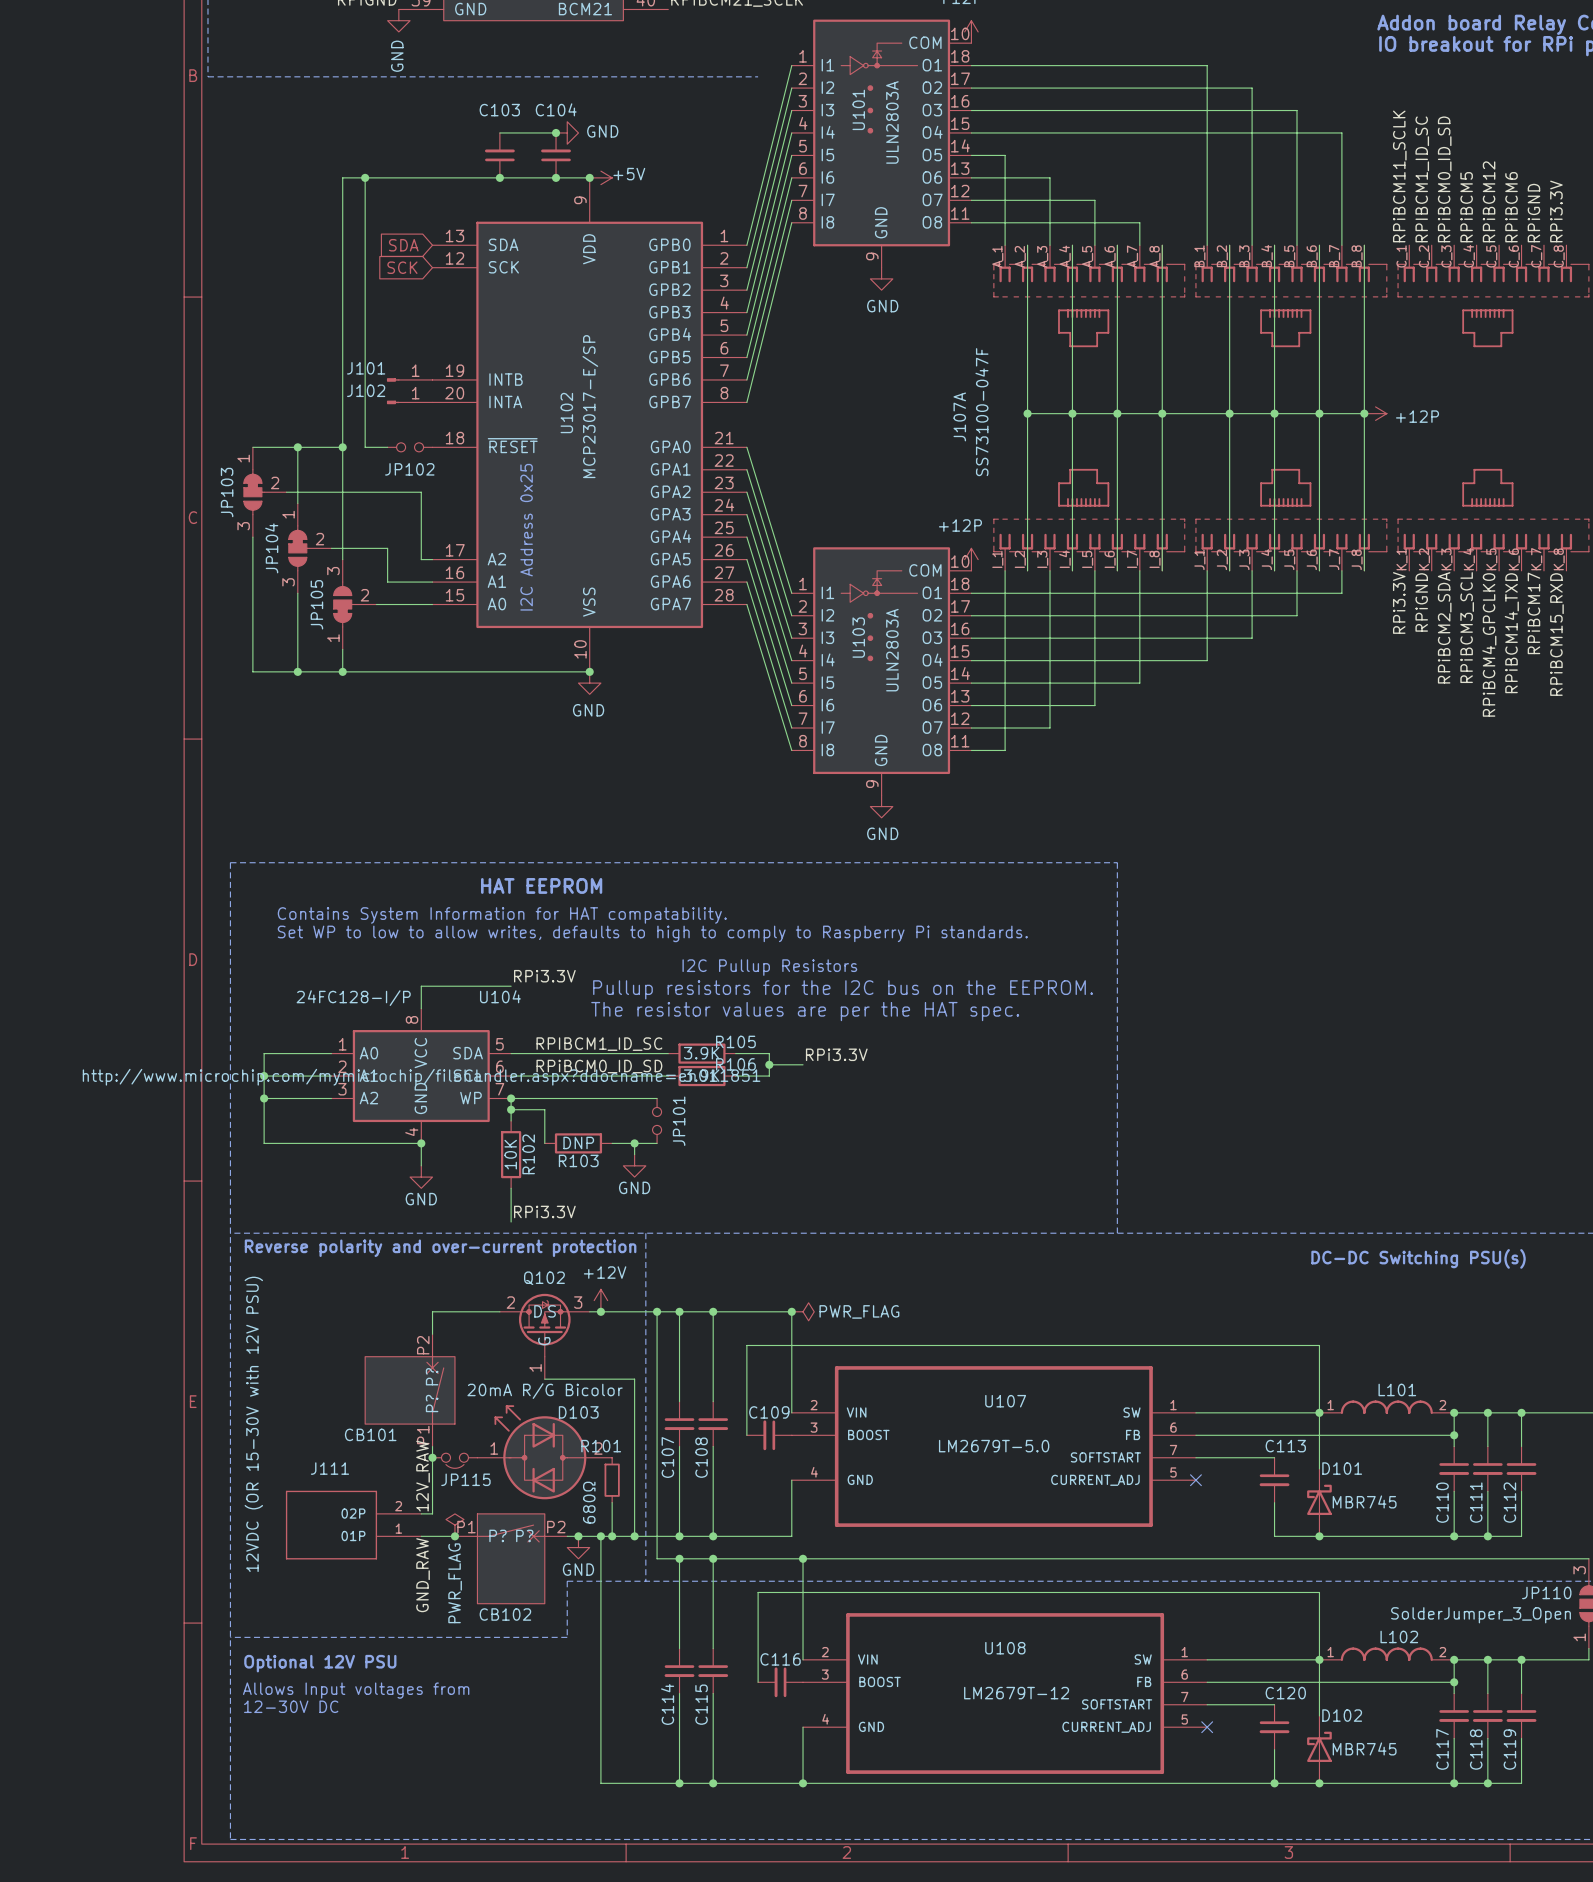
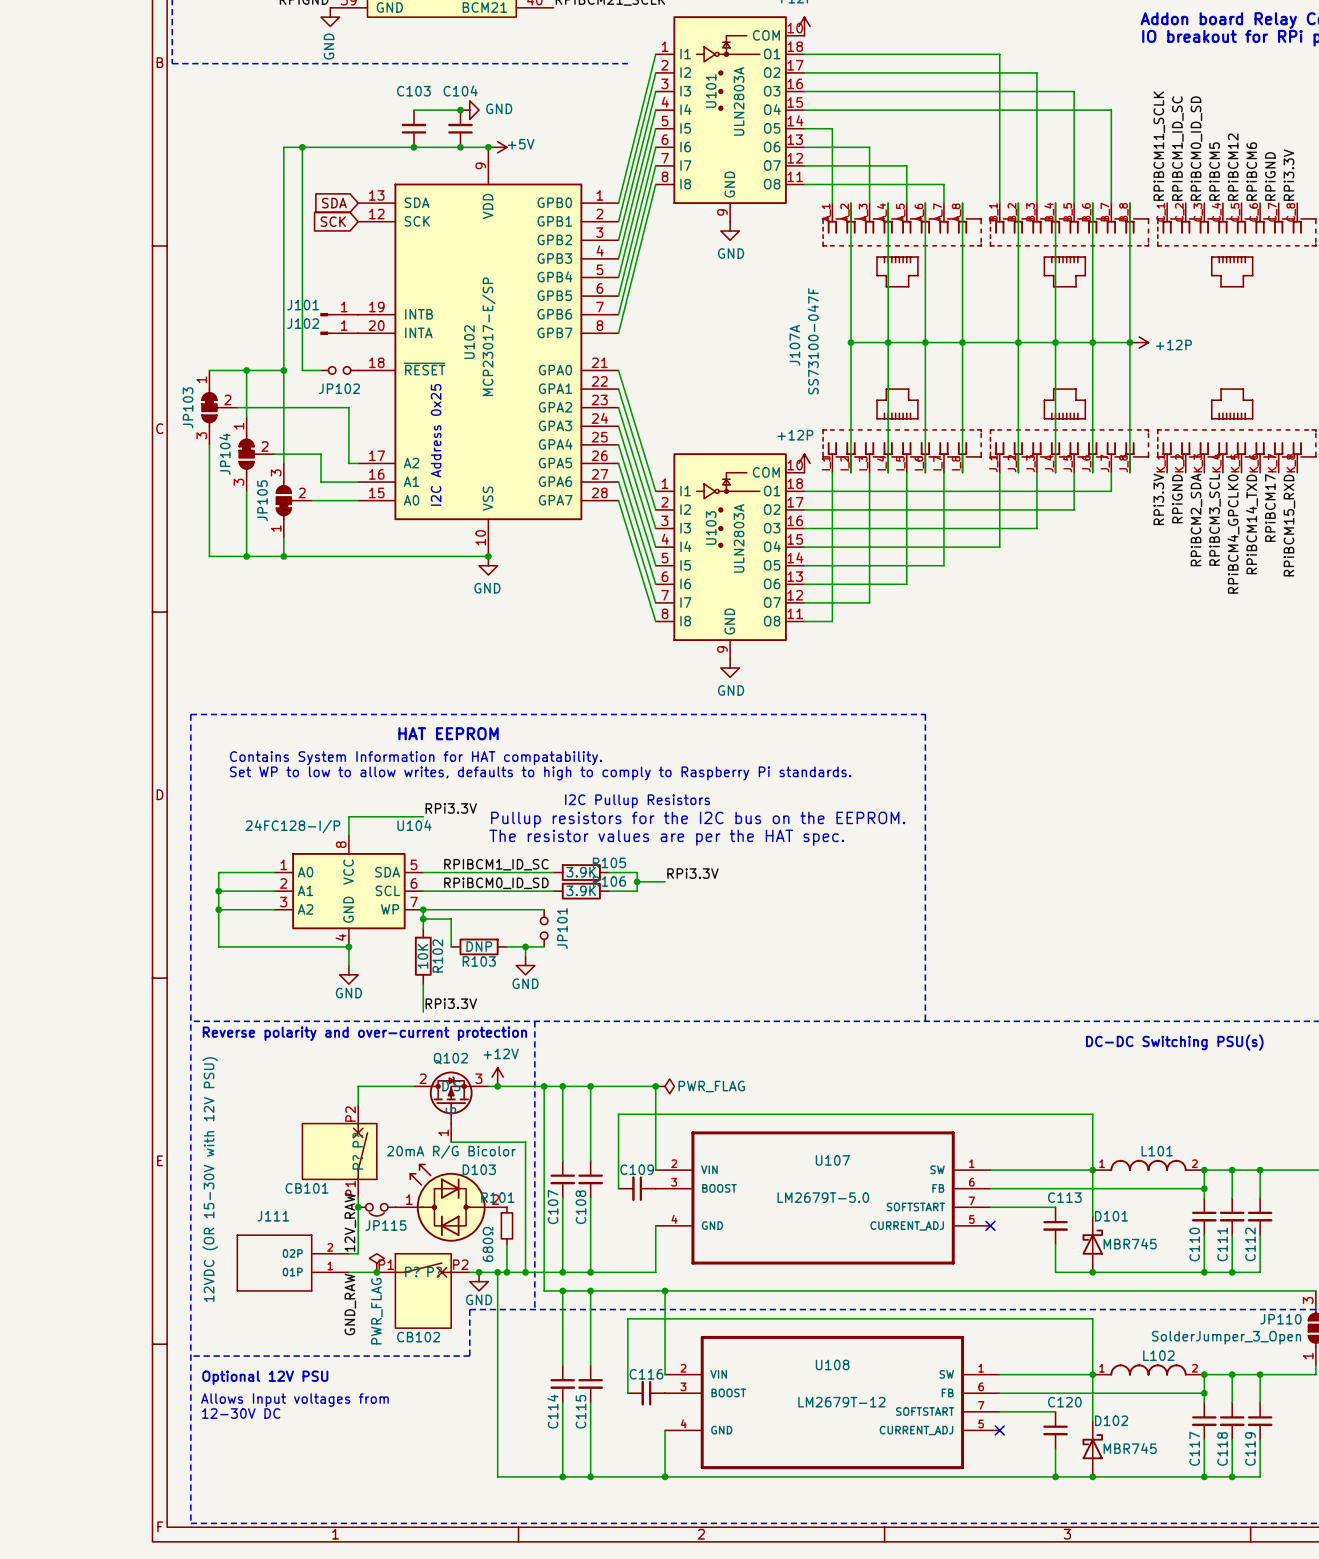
U104 text: http://www.microchip.com/mymicrochip/filehandler.aspx?ddocname=en011851 (421, 1077) -> none

